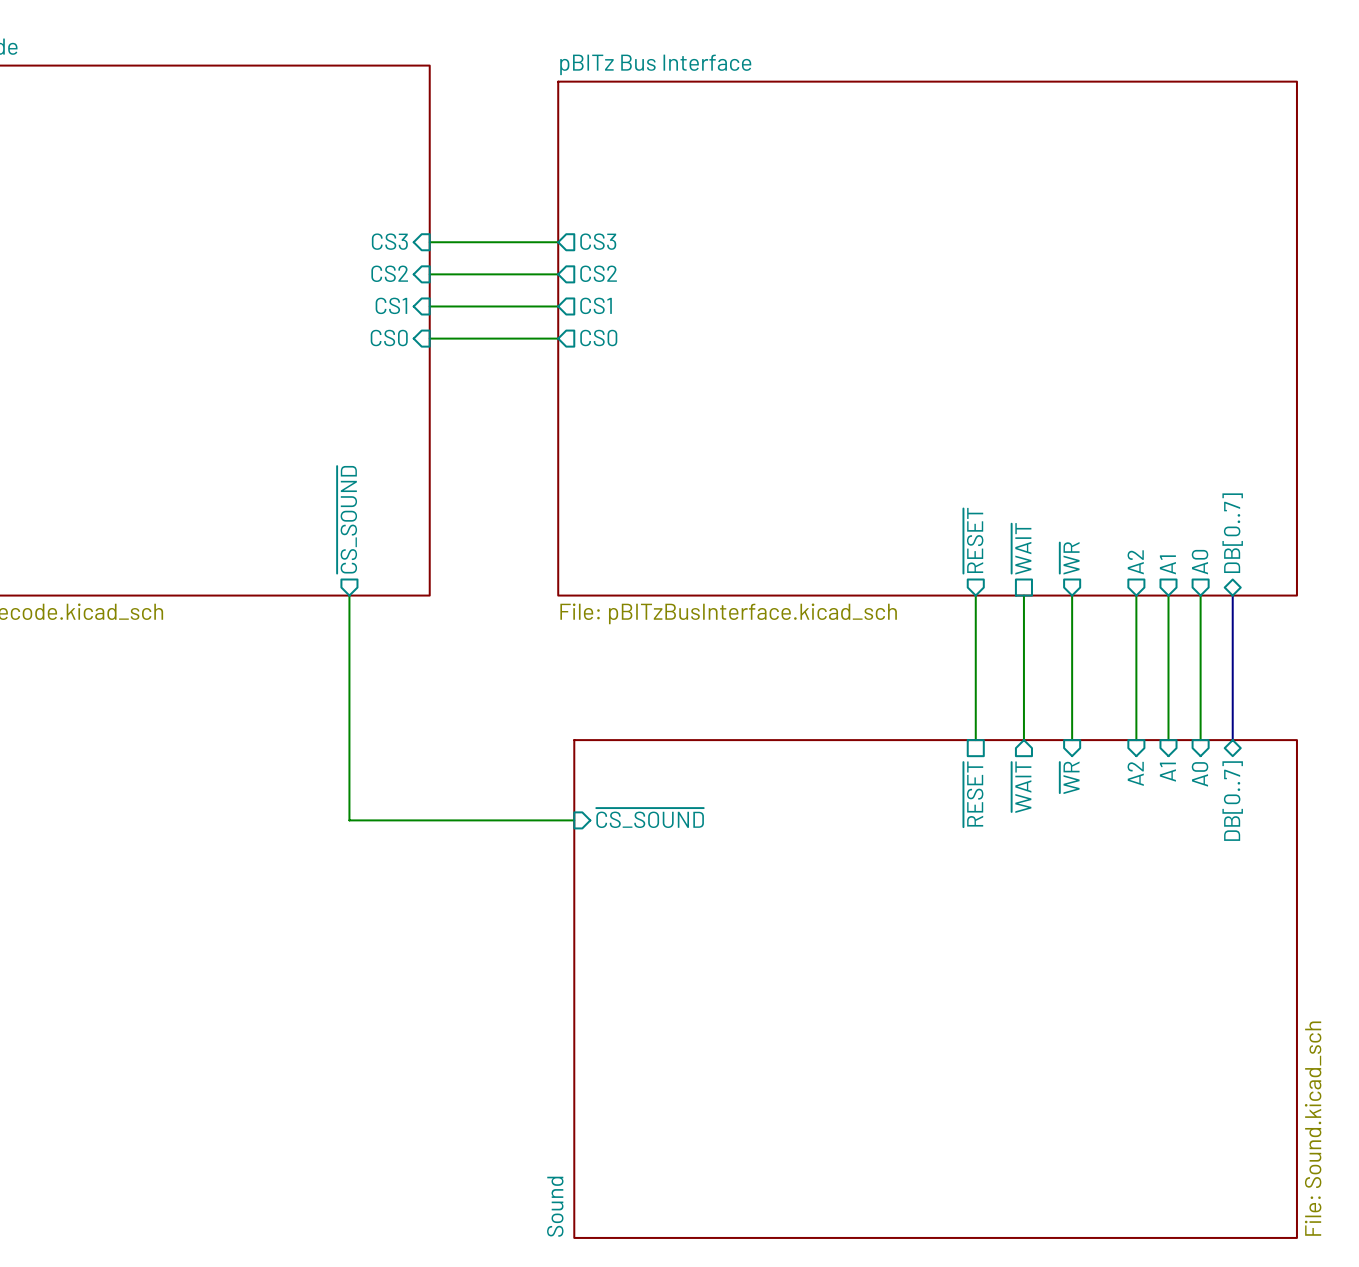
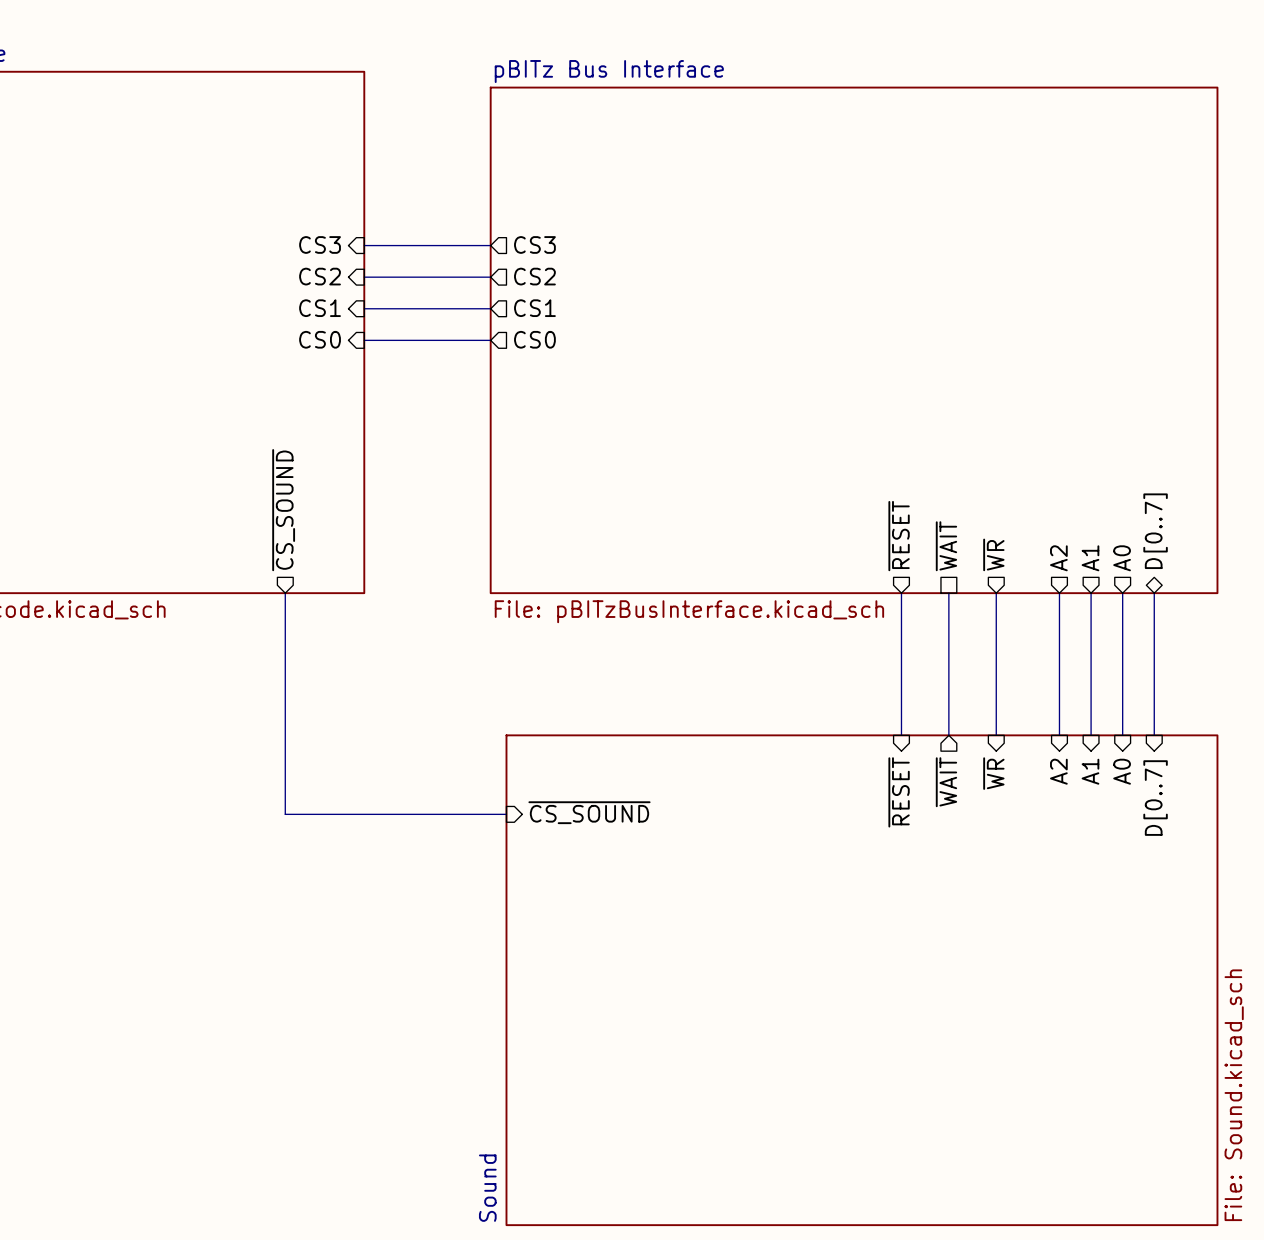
sheet pin: DB[0..7] (1232, 533) -> D[0..7] (1155, 531)
sheet pin shape: passive (973, 794) -> input (899, 792)
sheet pin shape: bidirectional (1232, 801) -> input (1155, 798)
sheet pin: DB[0..7] (1232, 801) -> D[0..7] (1155, 798)

